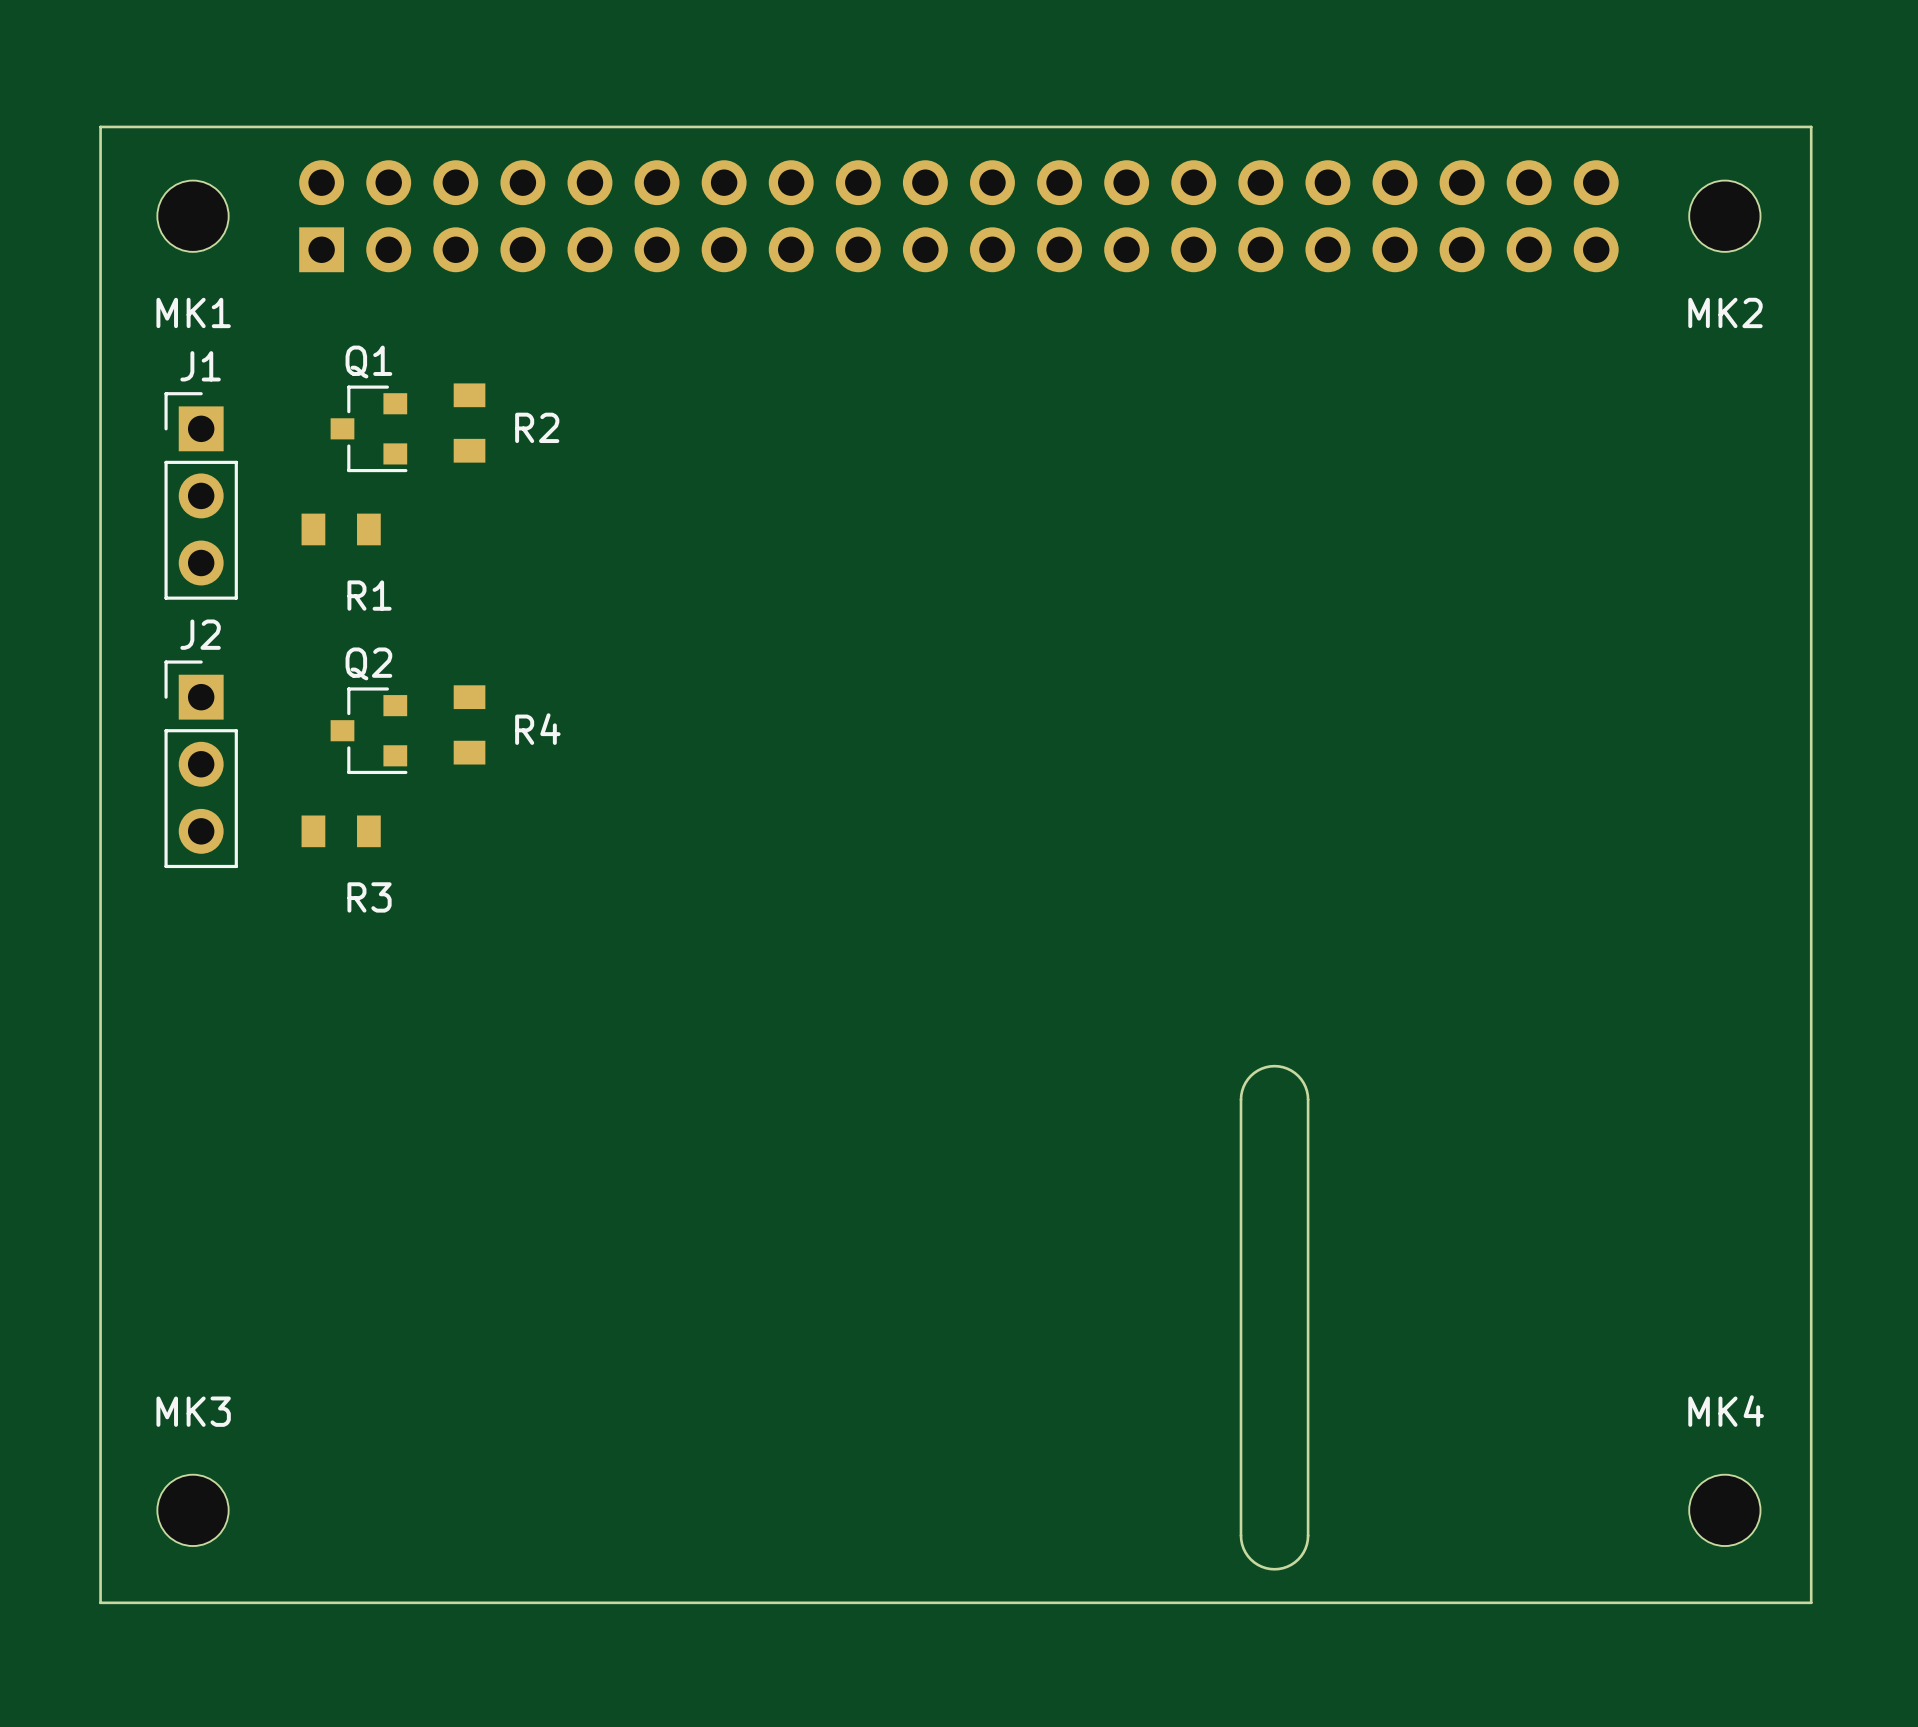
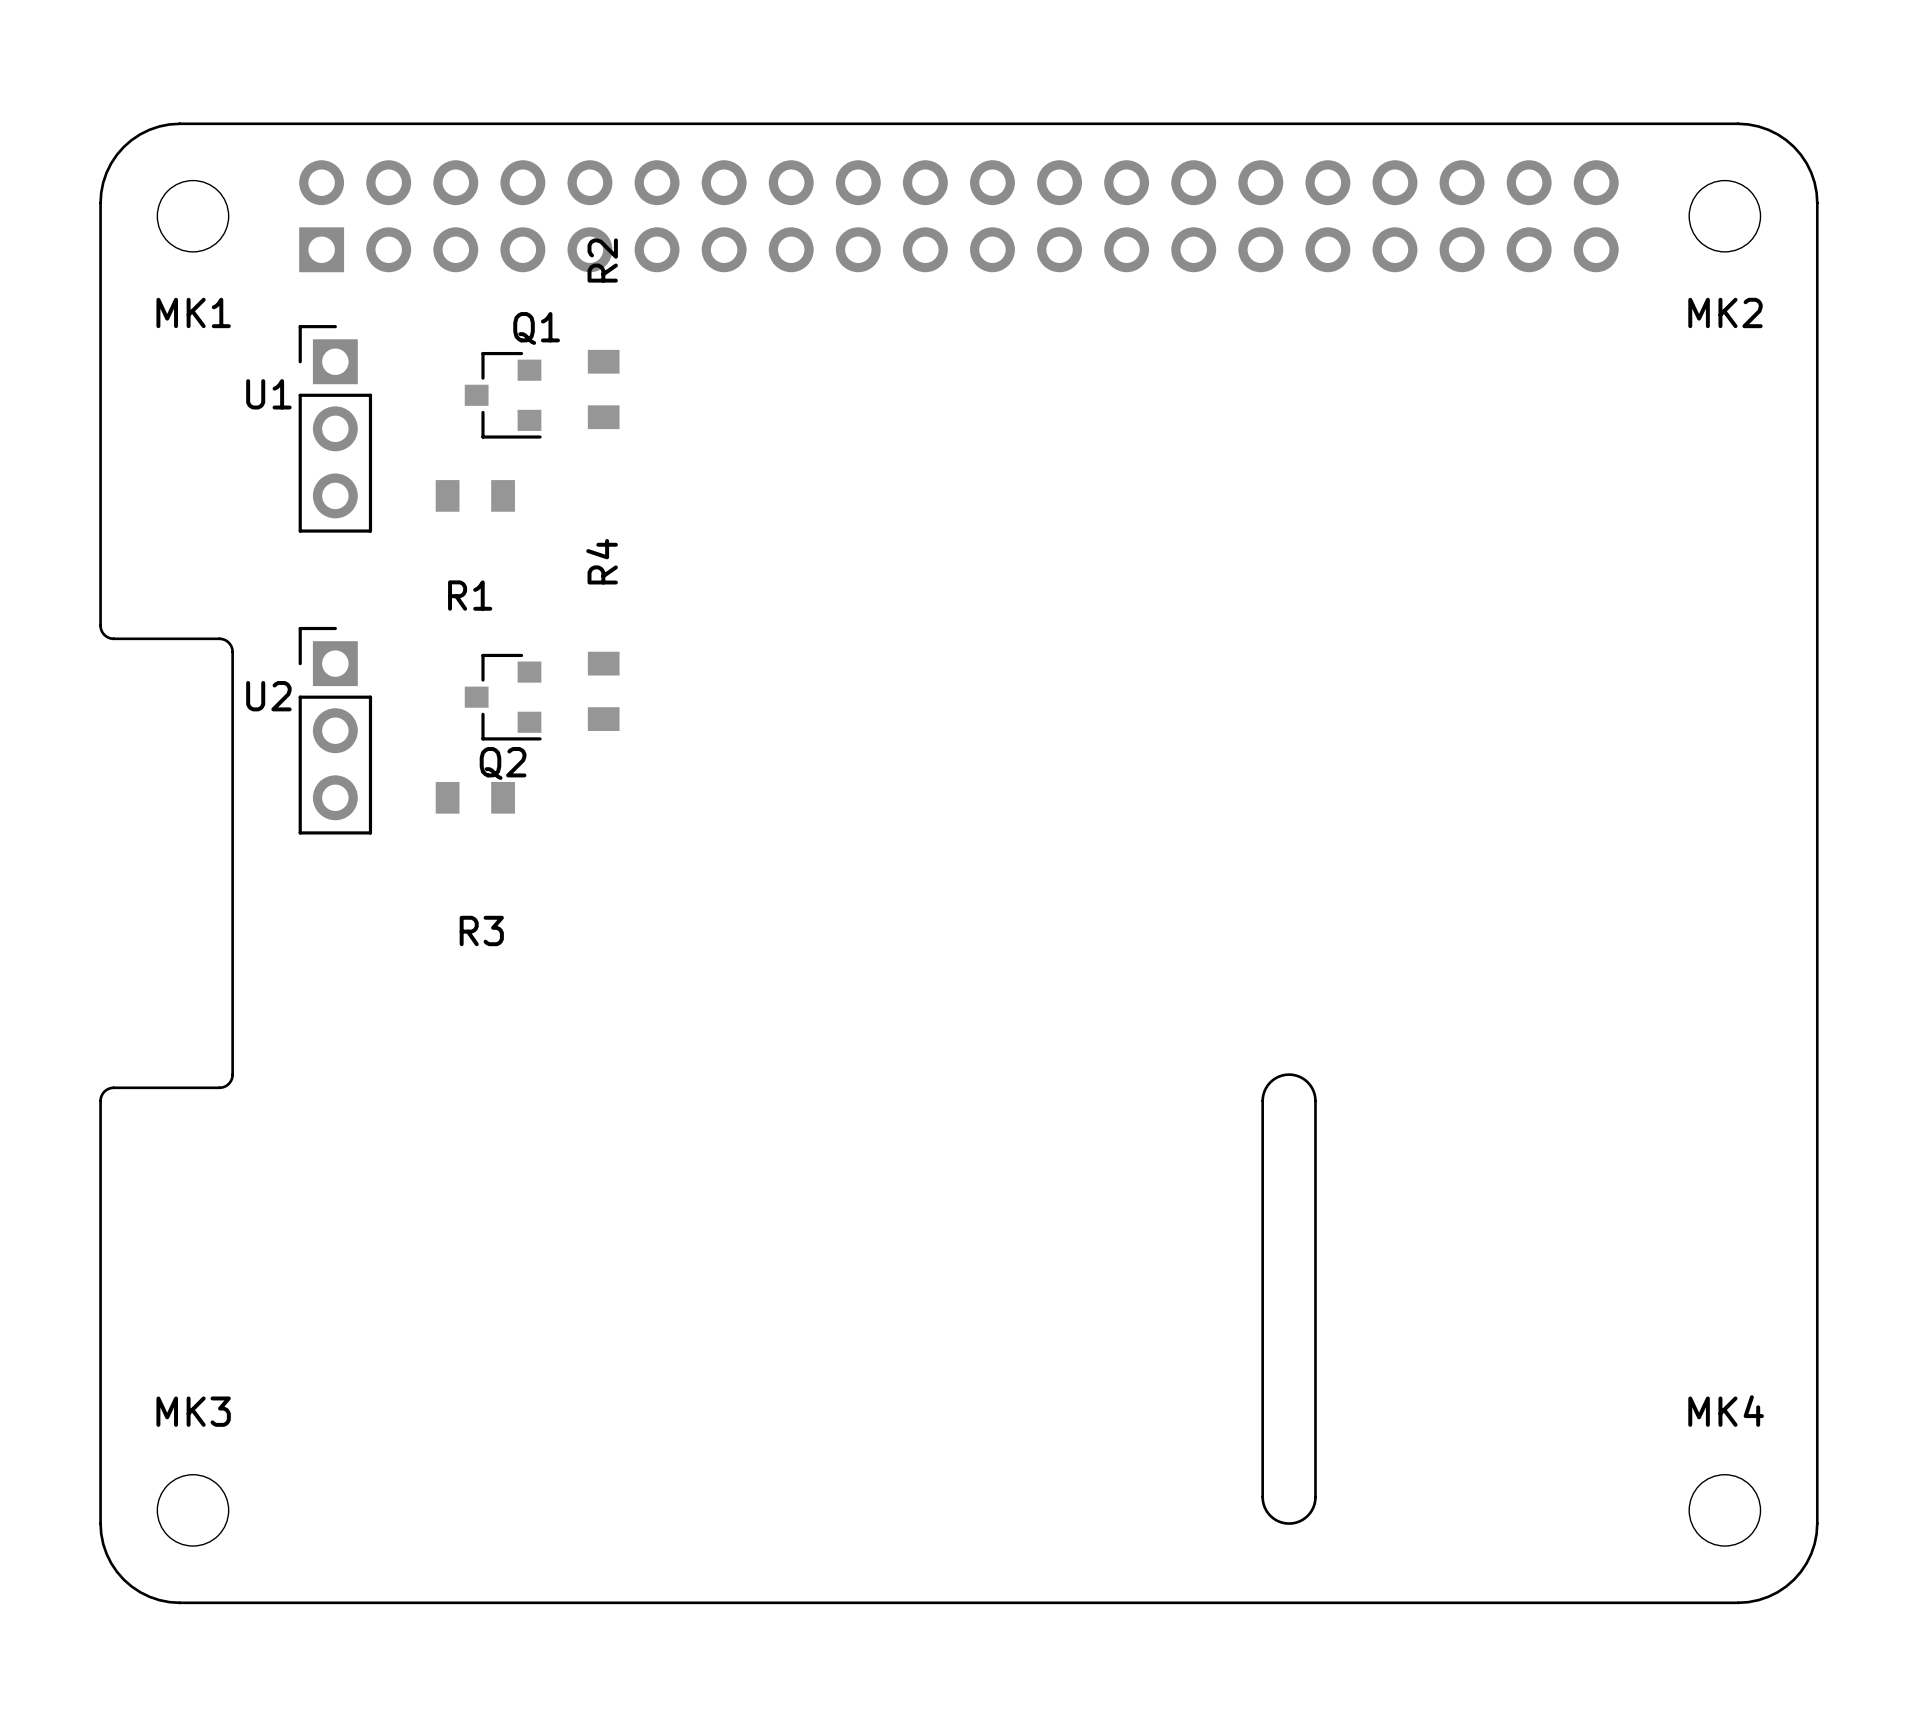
board edge: (100, 203) (100, 126) (1811, 126) (1811, 1602) (1738, 1602) -> (100, 203) (106, 172) (123, 146) (149, 129) (179, 123) (1738, 123) (1768, 129) (1786, 140) (1800, 154) (1811, 172) (1817, 203) (1817, 1523) (1811, 1553) (1794, 1579) (1768, 1596) (1738, 1602)
Q1 name position: Q1 (368, 362) -> Q1 (536, 328)
R2 position: (469, 423) -> (603, 389)
R2 name rotation: 0° (537, 427) -> 90° counterclockwise (602, 260)
R2 name position: R2 (537, 427) -> R2 (602, 260)
U1: none -> (335, 428)
Q1 position: (369, 428) -> (503, 395)
J1: (201, 495) -> none
R1 position: (341, 529) -> (475, 495)
R1 name position: R1 (369, 595) -> R1 (470, 595)
board edge: (100, 625) (100, 1101) -> (100, 625) (103, 633) (110, 638) (221, 638) (228, 642) (232, 652) (232, 1078) (228, 1083) (221, 1087) (112, 1087) (104, 1091) (100, 1101)
Q2 name position: Q2 (368, 663) -> Q2 (503, 763)
R4 position: (469, 724) -> (603, 691)
R4 name rotation: 0° (537, 729) -> 90° counterclockwise (602, 561)
R4 name position: R4 (537, 729) -> R4 (602, 561)
U2: none -> (335, 730)
Q2 position: (369, 730) -> (503, 697)
J2: (201, 764) -> none
R3 position: (341, 831) -> (475, 797)
R3 name position: R3 (369, 897) -> R3 (481, 930)
board edge: (1241, 1099) (1241, 1540) (1245, 1552) (1254, 1562) (1265, 1568) (1278, 1568) (1291, 1564) (1301, 1556) (1306, 1544) (1308, 1535) (1307, 1095) (1303, 1082) (1294, 1073) (1283, 1067) (1270, 1066) (1257, 1070) (1247, 1079) (1243, 1086) (1241, 1099) -> (1262, 1101) (1262, 1500) (1266, 1510) (1272, 1518) (1282, 1522) (1292, 1523) (1302, 1520) (1310, 1513) (1315, 1497) (1315, 1097) (1311, 1087) (1305, 1080) (1295, 1075) (1285, 1074) (1275, 1078) (1268, 1084) (1262, 1101)
board edge: (100, 1523) (100, 1602) (179, 1602) -> (100, 1523) (106, 1553) (123, 1579) (149, 1596) (179, 1602)

